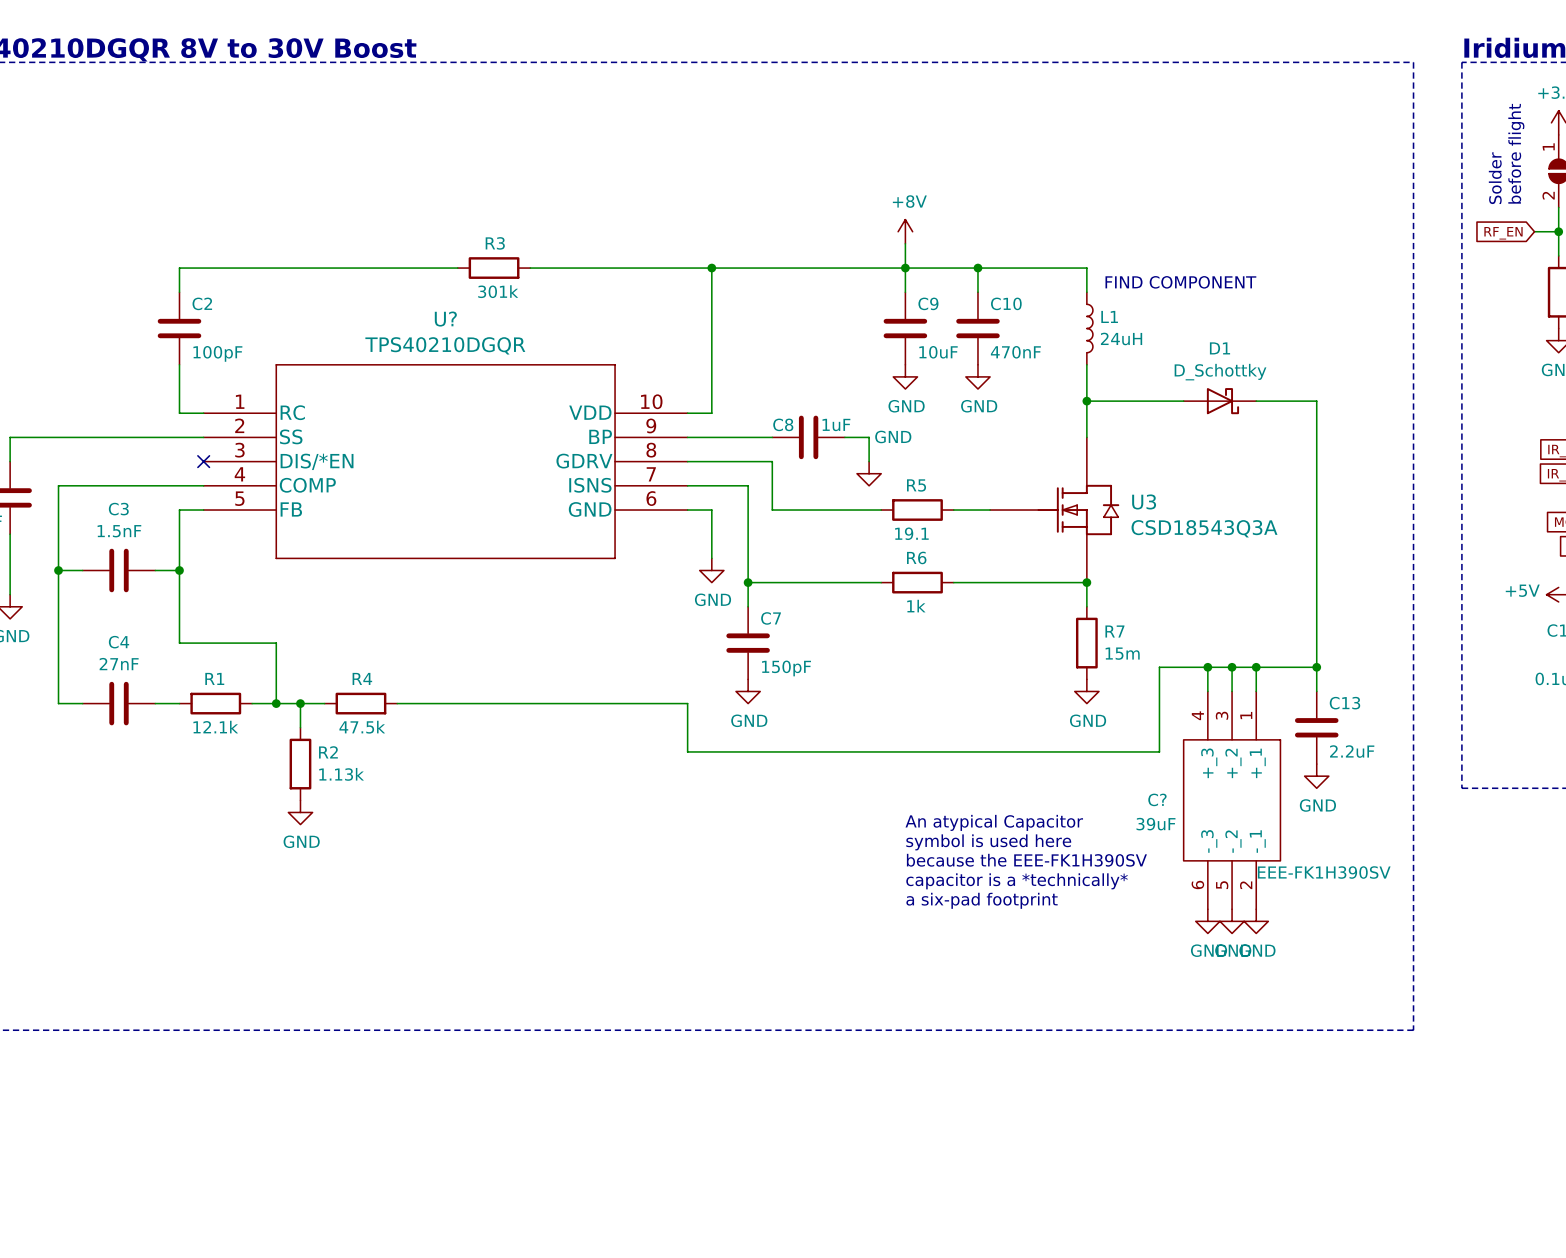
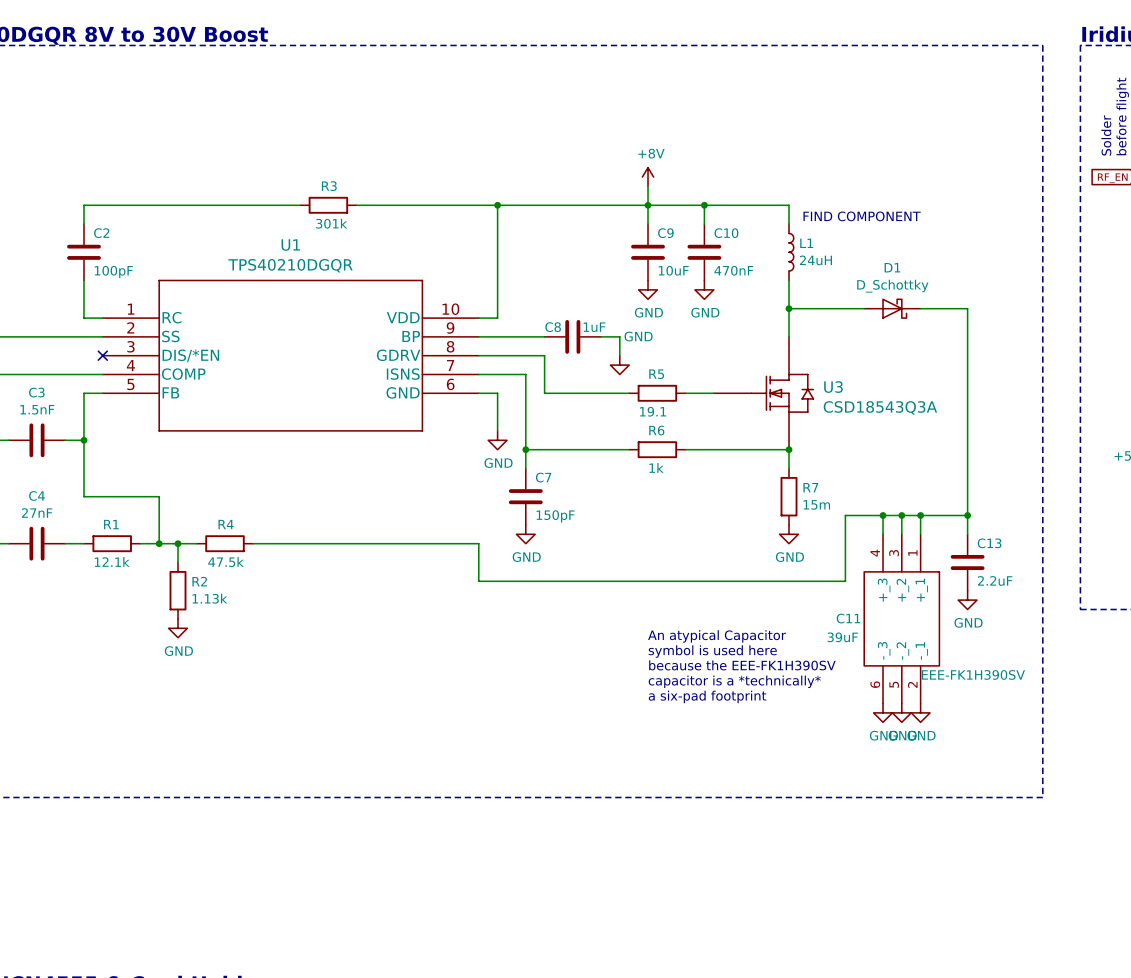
U? name: U? (445, 319) -> U1 (290, 245)
C? name: C? (1157, 799) -> C11 (848, 618)

